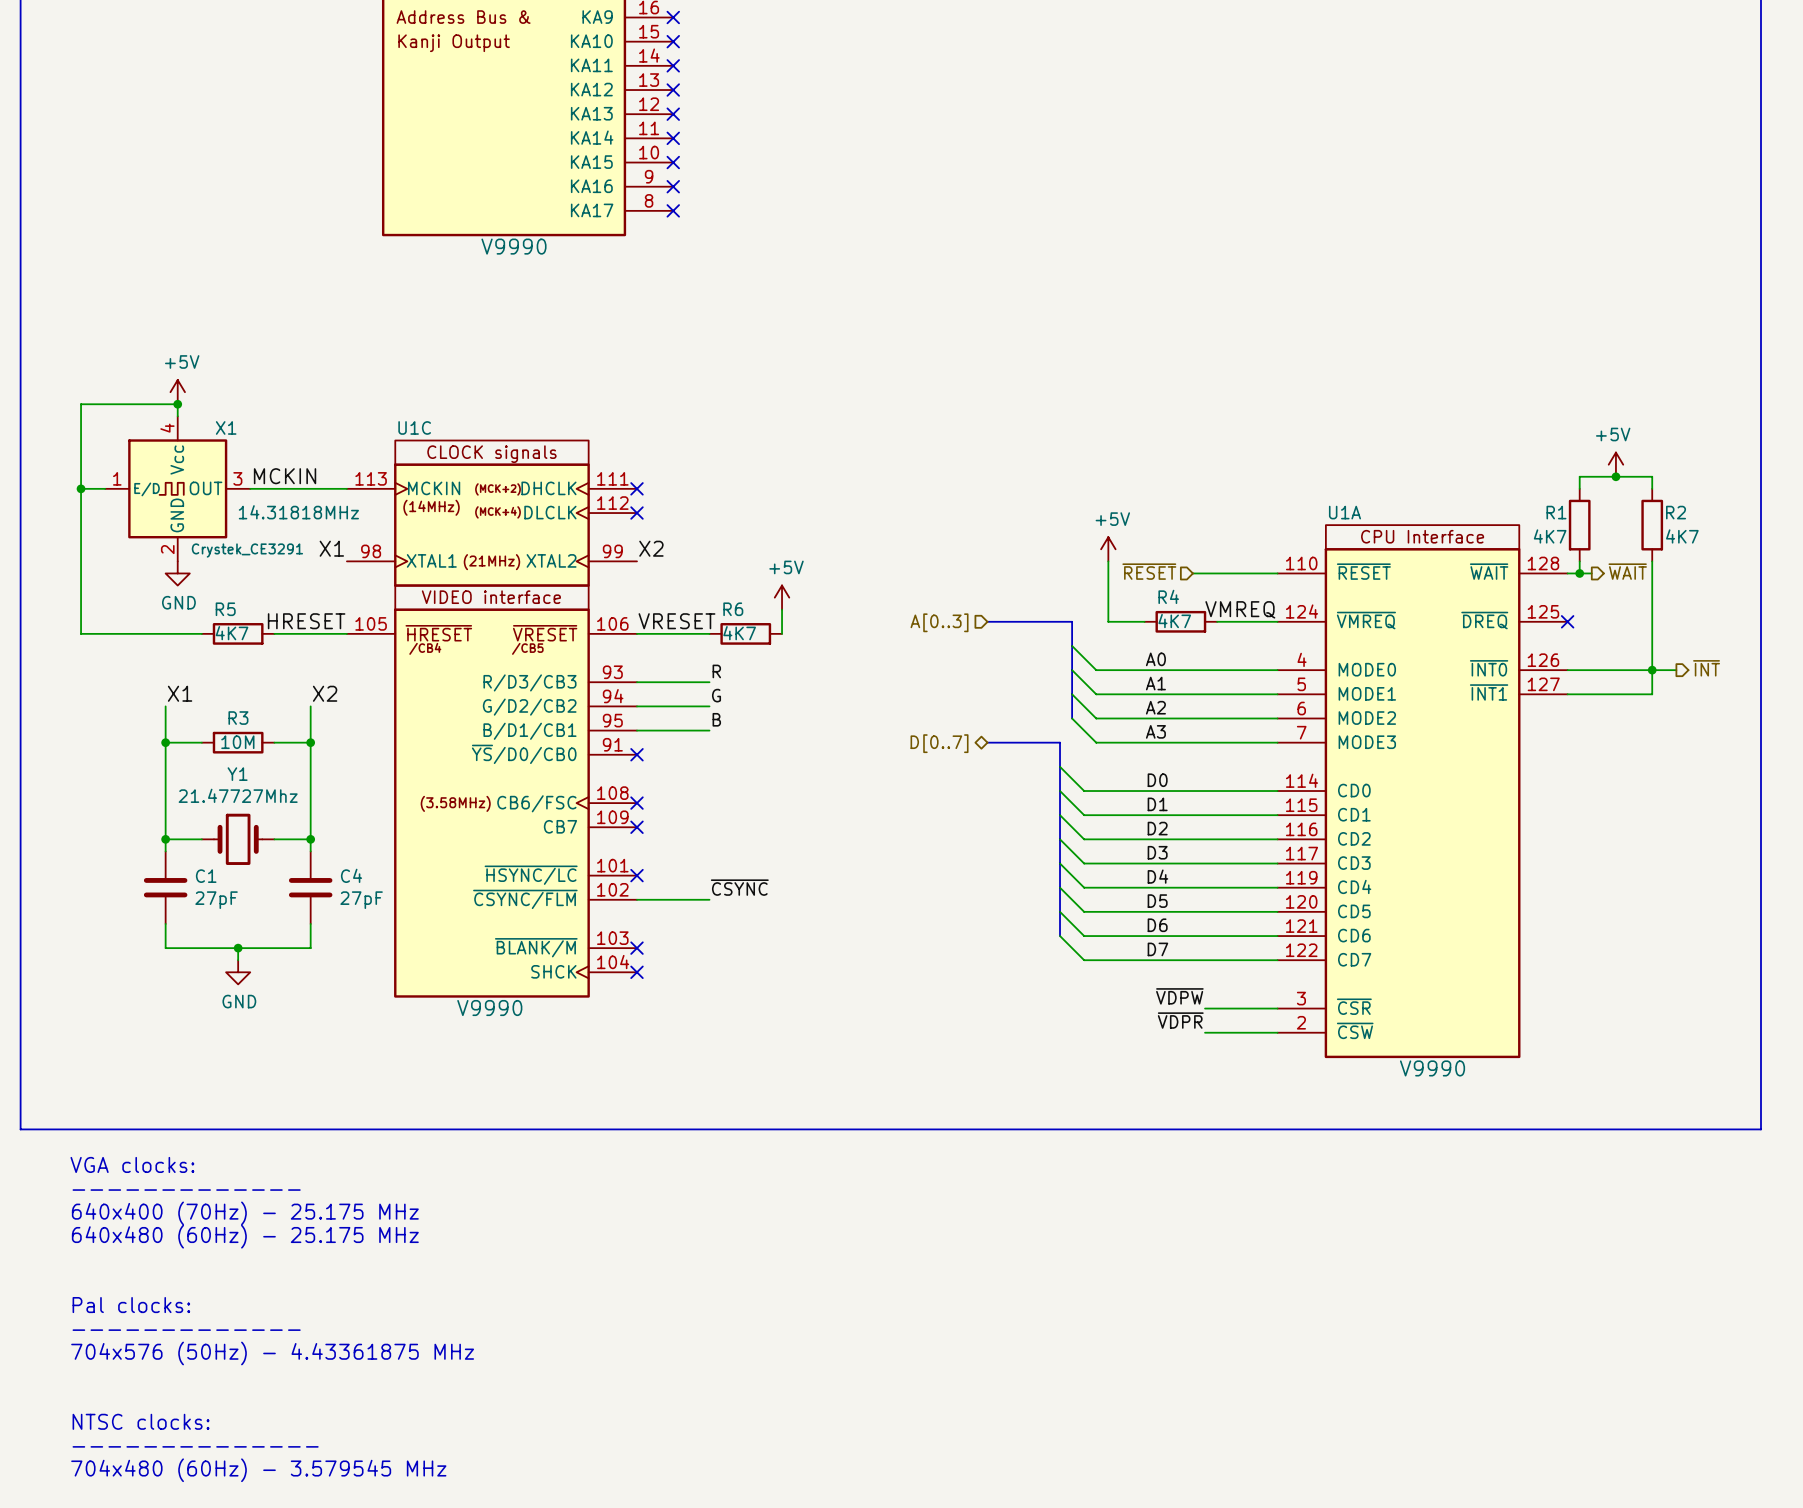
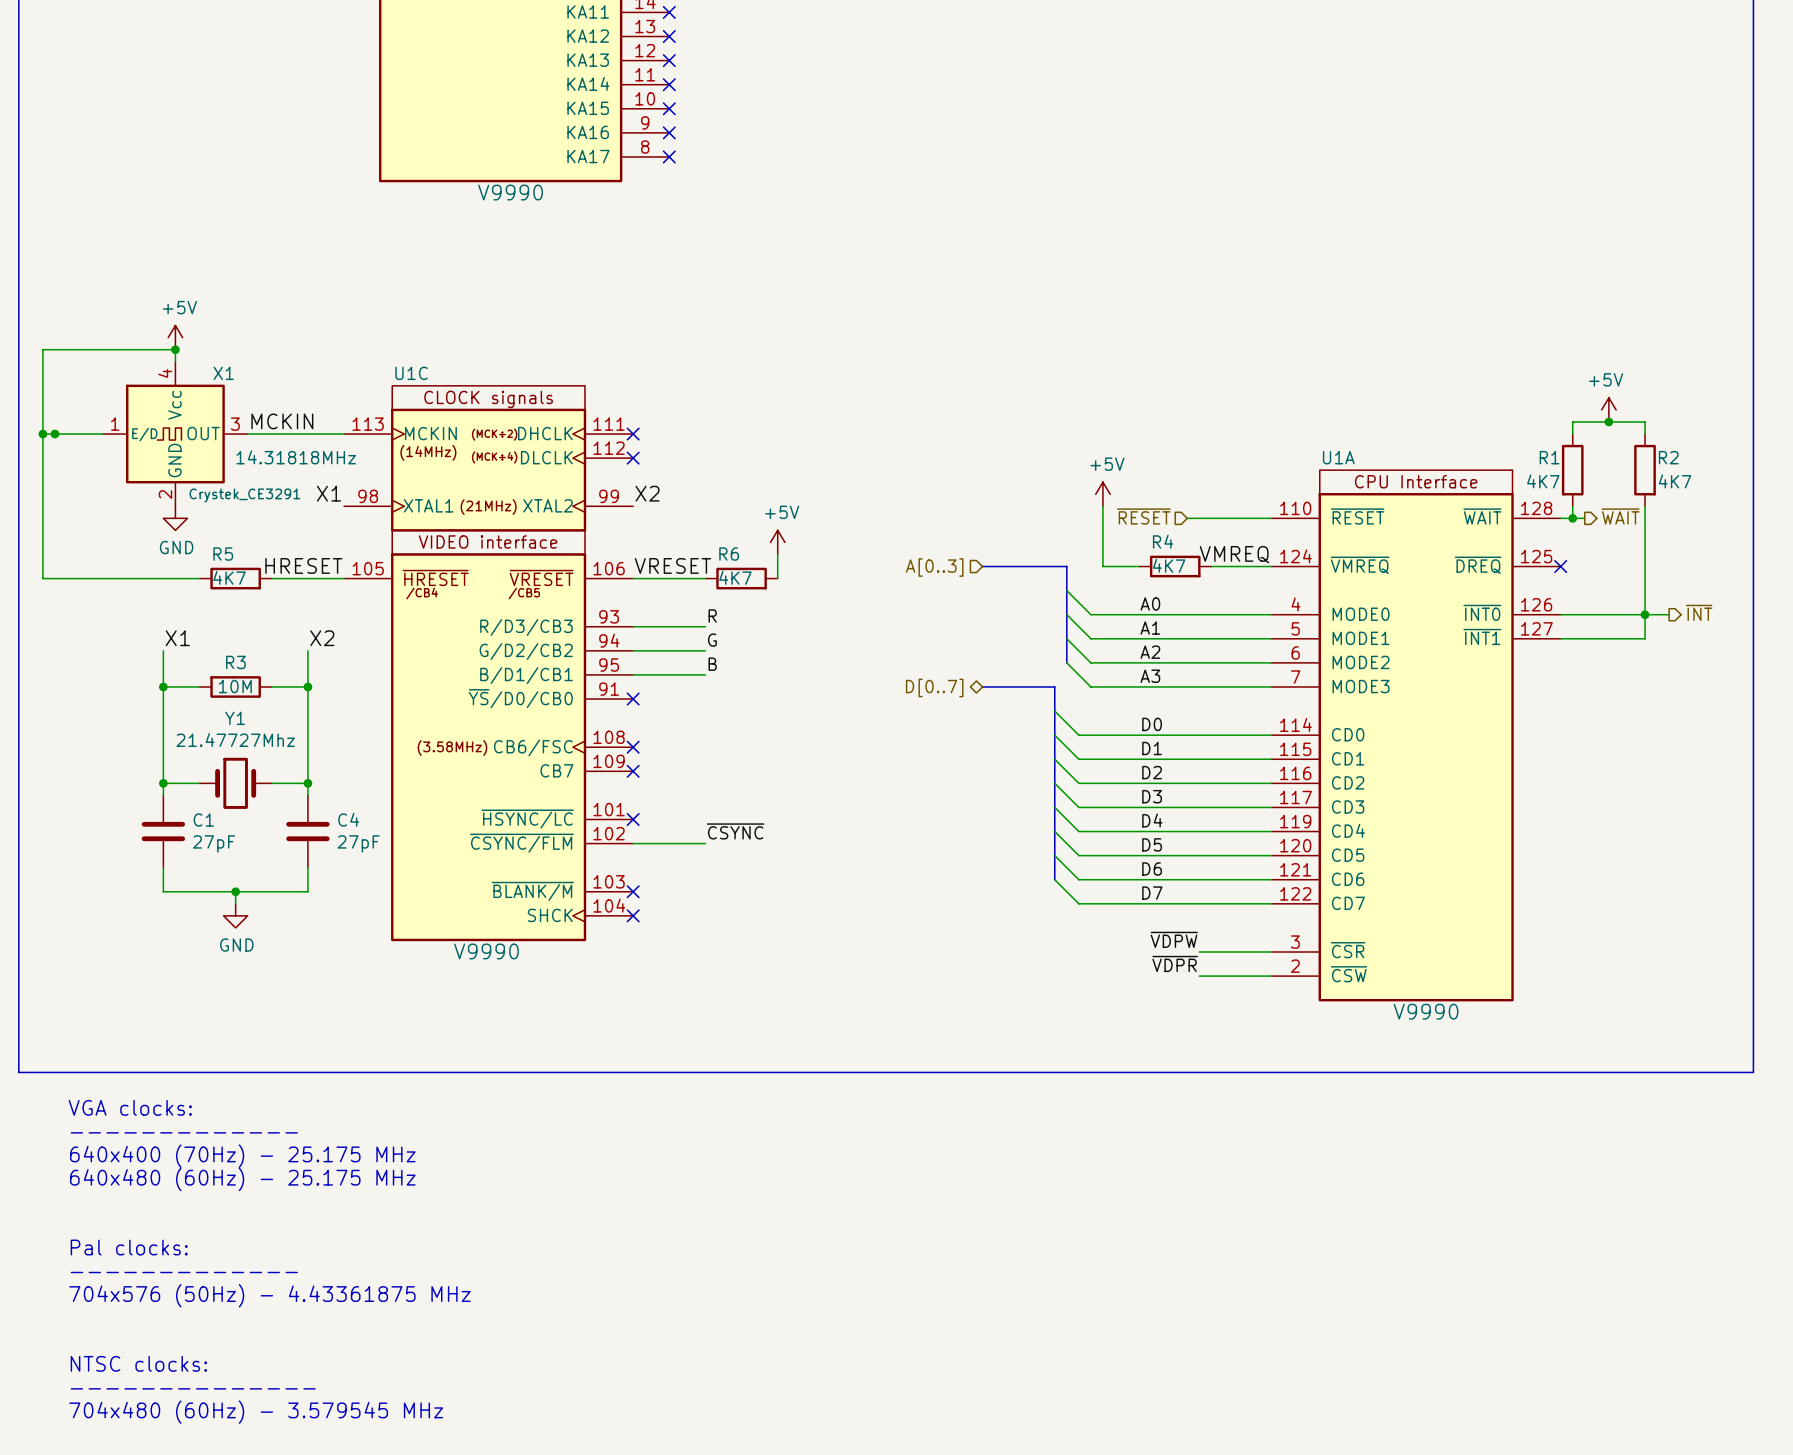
wire: (81, 404) (81, 633) -> (79, 349) (42, 349) (42, 578) (79, 578)
wire: none -> (42, 434) (79, 434)
junction: none -> (42, 434)
junction: none -> (54, 434)
junction: (81, 488) -> none

